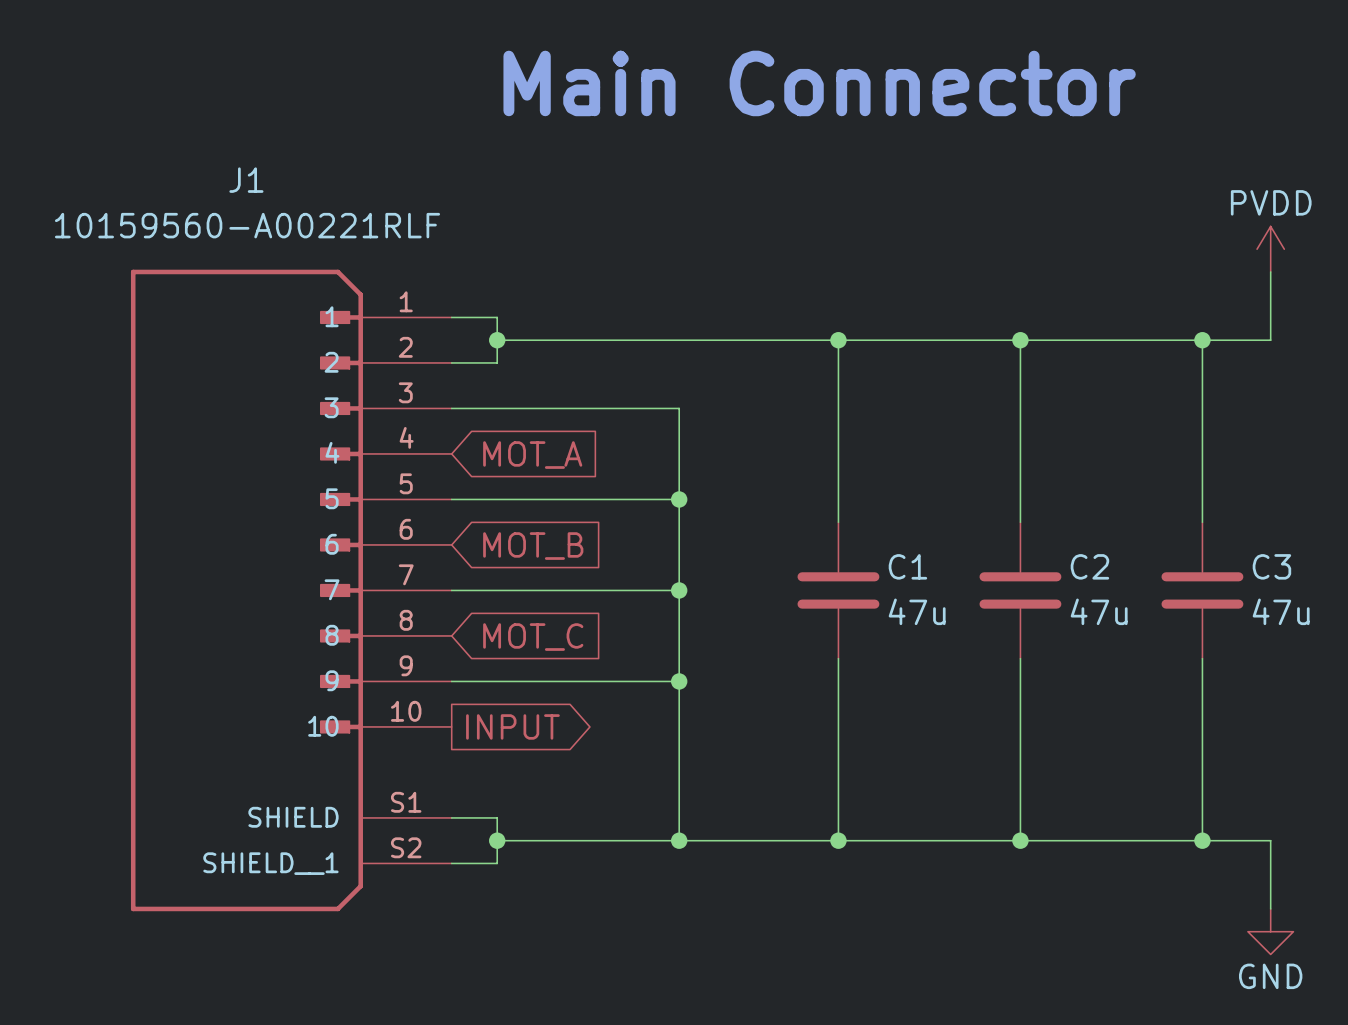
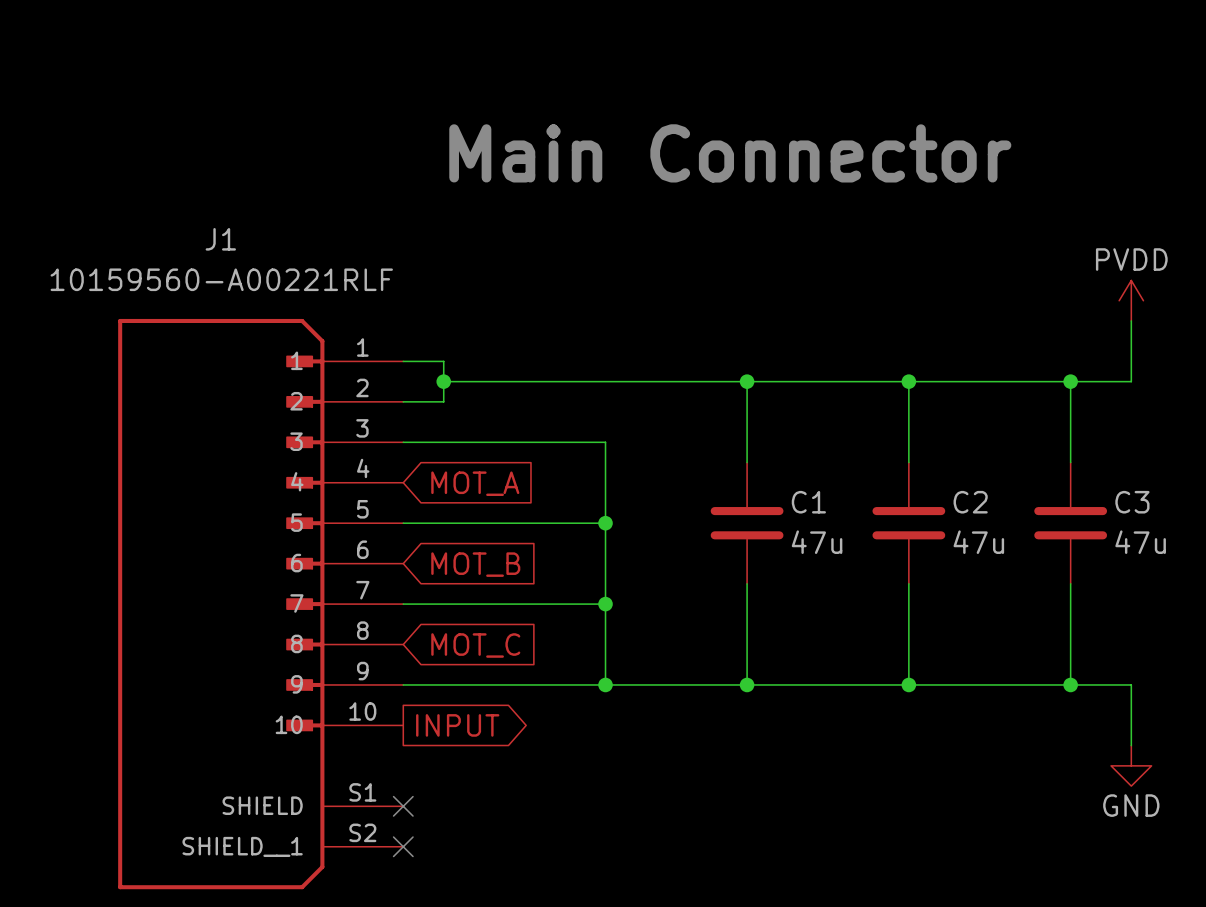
text position: Main Connector (819, 83) -> Main Connector (730, 153)
power symbol position: PVDD (1270, 249) -> PVDD (1131, 300)
wire: (1270, 271) (1270, 340) (497, 340) -> (1131, 320) (1131, 381) (443, 381)
wire: (451, 317) (497, 317) (497, 362) (451, 362) -> none
junction position: (497, 340) -> (443, 381)
wire: (838, 340) (838, 431) -> none
junction: (838, 340) -> none
wire: (1020, 340) (1020, 431) -> none
junction position: (1020, 340) -> (908, 381)
wire: (1202, 340) (1202, 431) -> none
junction position: (1202, 340) -> (1070, 381)
wire: (497, 408) (679, 408) (679, 499) -> (443, 361) (443, 401) (403, 401)
junction: none -> (747, 381)
global label: MOT_A (532, 455) -> none
junction: (679, 499) -> none
global label: MOT_B (533, 546) -> MOT_A (475, 483)
J1 position: (291, 590) -> (260, 604)
global label: MOT_C (533, 637) -> MOT_B (475, 564)
global label shape: output (512, 726) -> input (475, 645)
global label: INPUT (512, 726) -> MOT_C (475, 645)
wire: none -> (403, 684) (1131, 684) (1131, 745)
wire: (679, 772) (679, 840) -> none
wire: (838, 772) (838, 840) -> none
wire: (1020, 772) (1020, 840) -> none
wire: (1202, 772) (1202, 840) -> none
wire: (451, 817) (497, 817) (497, 863) (451, 863) -> none
global label: none -> INPUT (457, 725)
wire: (497, 840) (1270, 840) (1270, 908) -> none
junction: (497, 840) -> none
junction position: (679, 840) -> (605, 684)
junction position: (838, 840) -> (747, 684)
junction position: (1020, 840) -> (908, 684)
junction position: (1202, 840) -> (1070, 684)
no-connect mark: none -> (403, 806)
power symbol position: GND (1270, 931) -> GND (1131, 765)
no-connect mark: none -> (403, 846)

